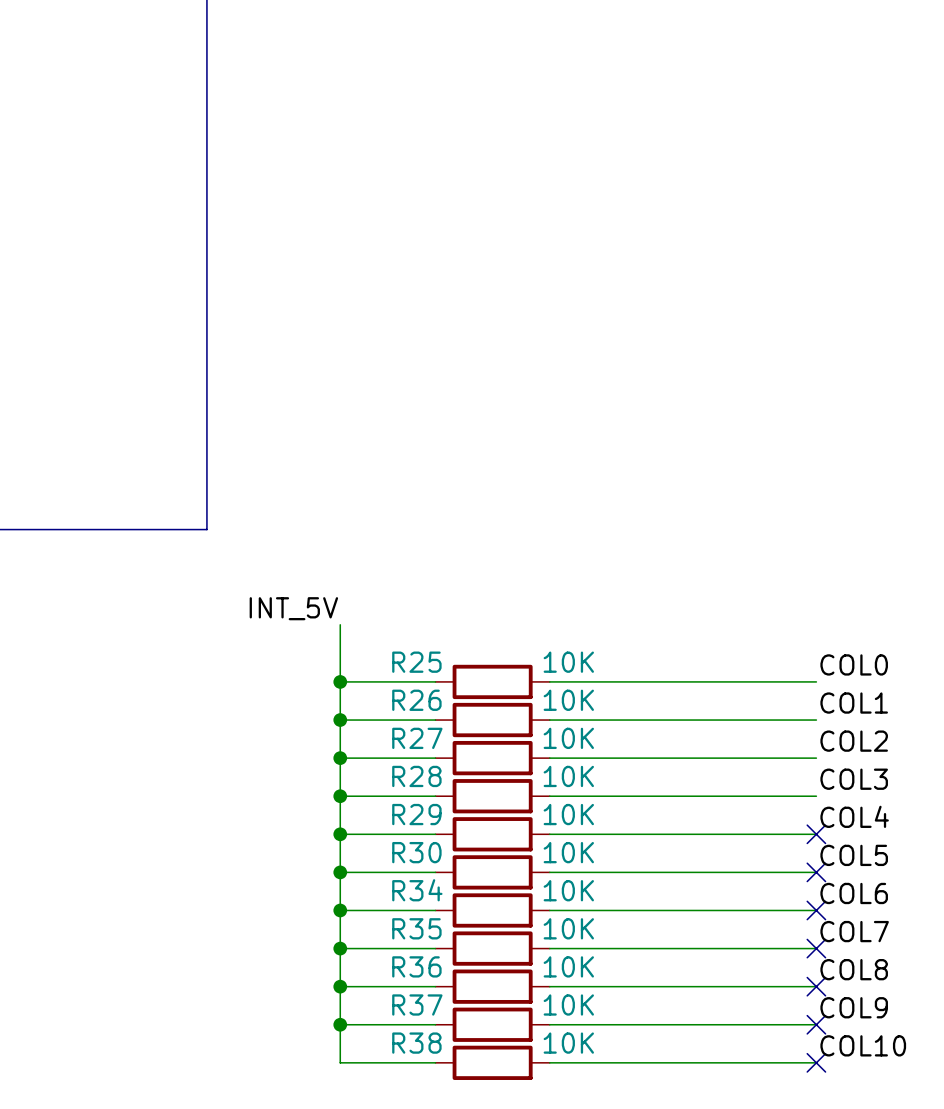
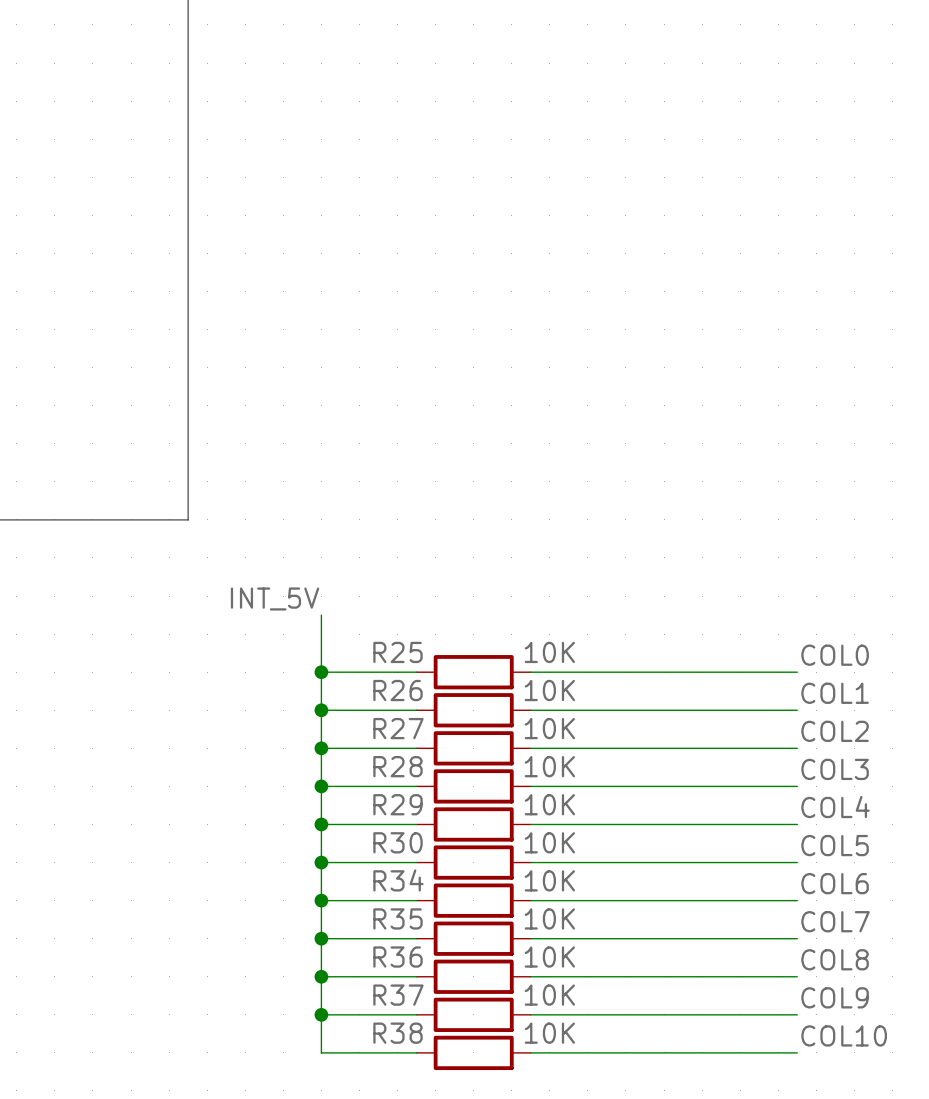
no-connect mark: (816, 834) -> none
no-connect mark: (816, 872) -> none
no-connect mark: (816, 910) -> none
no-connect mark: (816, 948) -> none
no-connect mark: (816, 986) -> none
no-connect mark: (816, 1024) -> none
no-connect mark: (816, 1062) -> none

